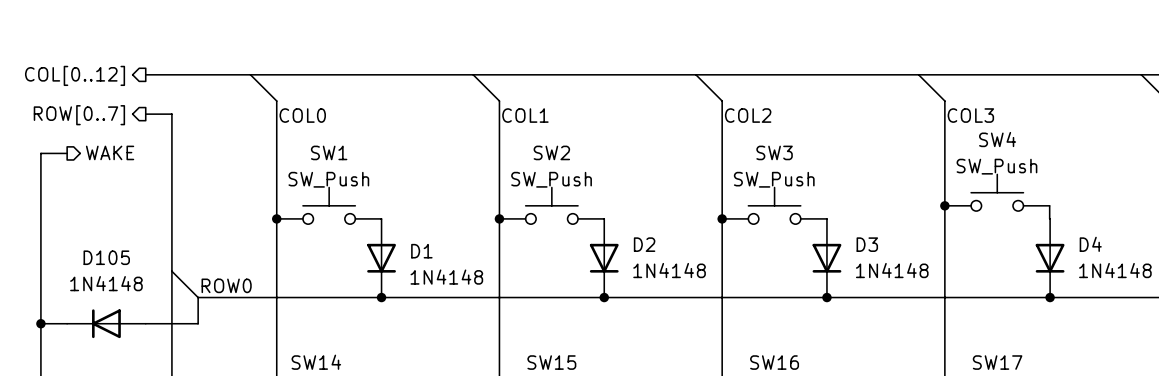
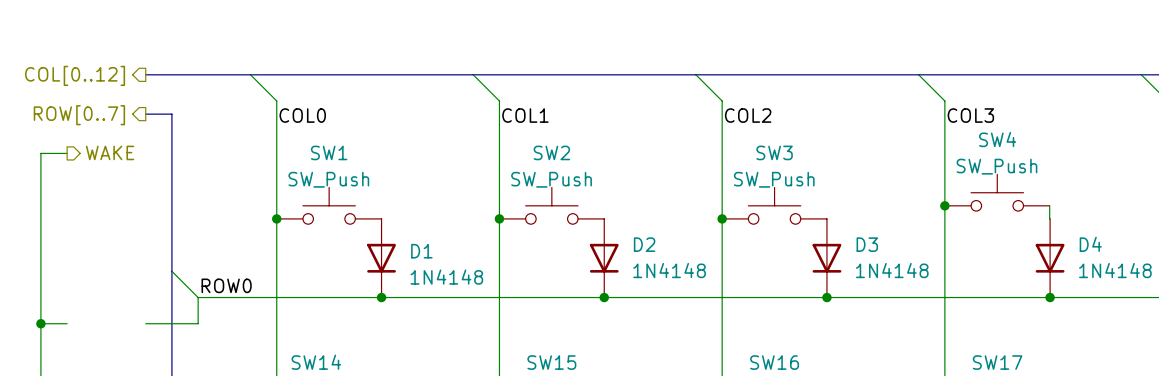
D105: 1N4148 (106, 323) -> none

